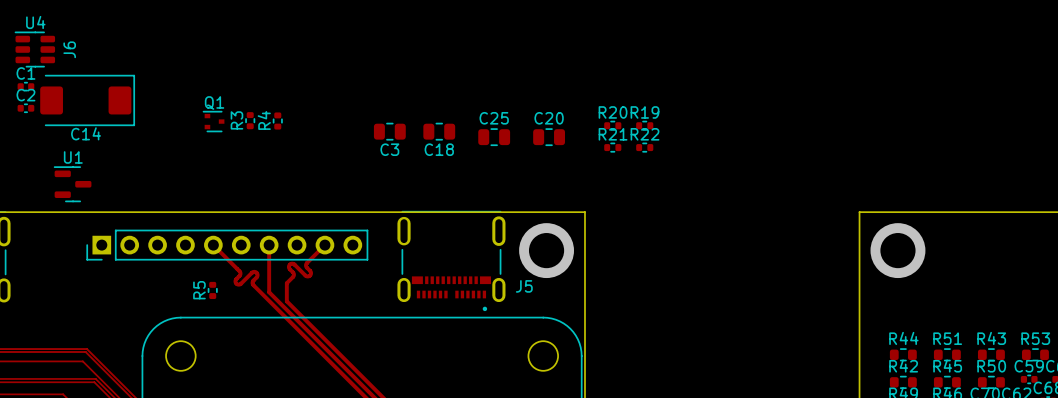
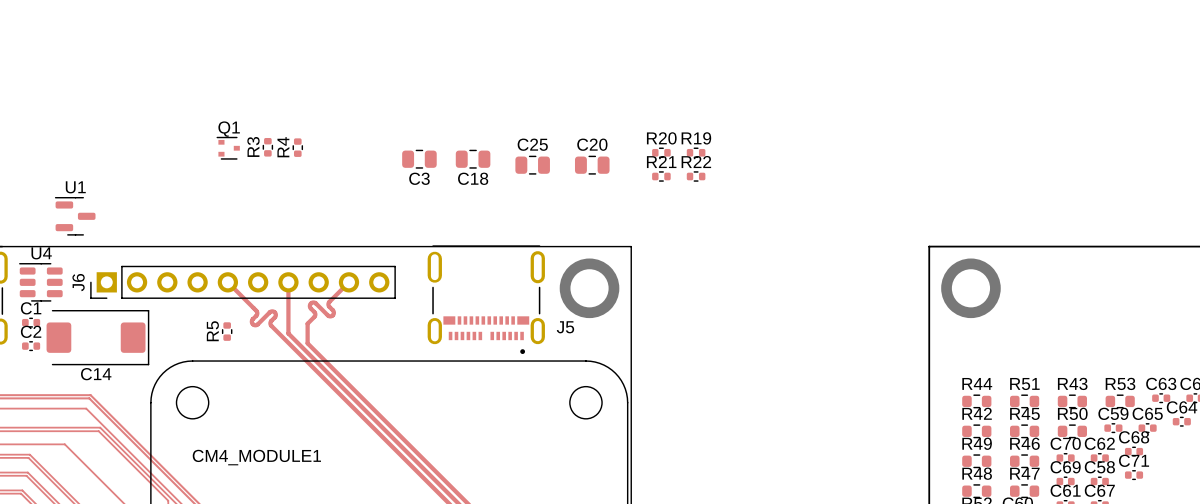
U4 position: (34, 49) -> (40, 282)
J6 name position: J6 (69, 49) -> J6 (78, 282)
C1 position: (25, 86) -> (31, 322)
C14 position: (87, 100) -> (97, 337)
C2 position: (25, 108) -> (31, 346)

